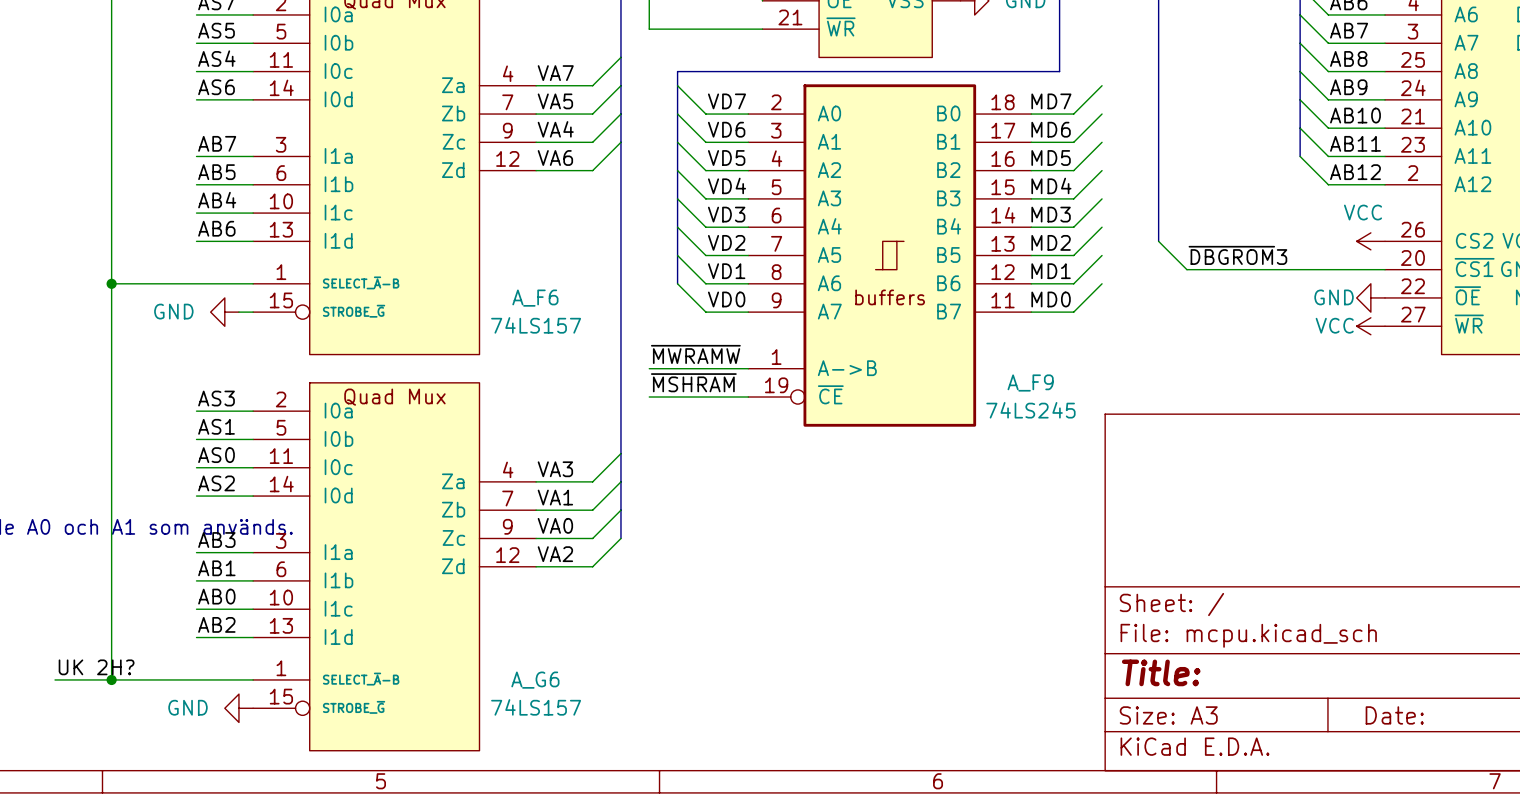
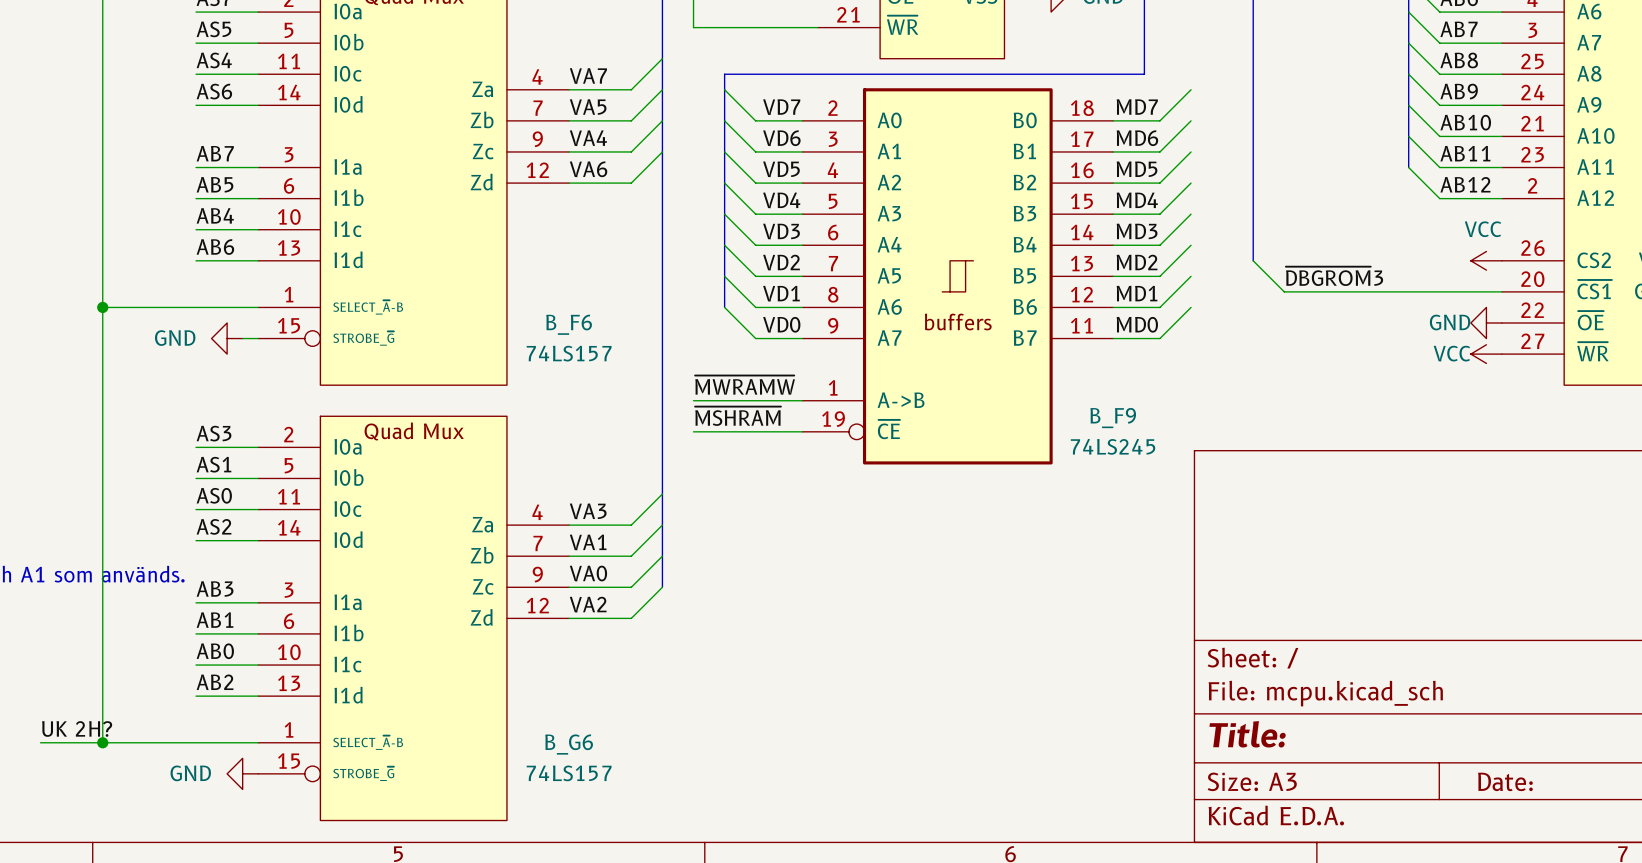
A_F6 name: A_F6 (535, 298) -> B_F6 (569, 324)
A_F9 name: A_F9 (1030, 383) -> B_F9 (1113, 418)
A_G6 name: A_G6 (535, 680) -> B_G6 (569, 744)

